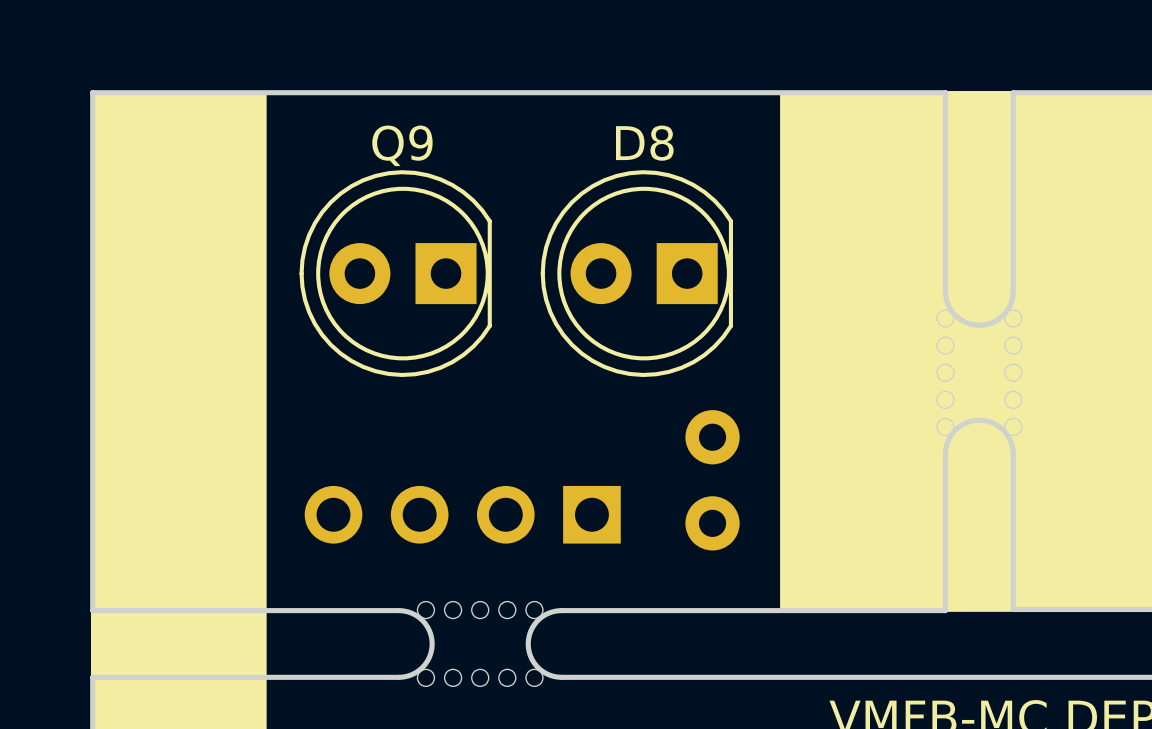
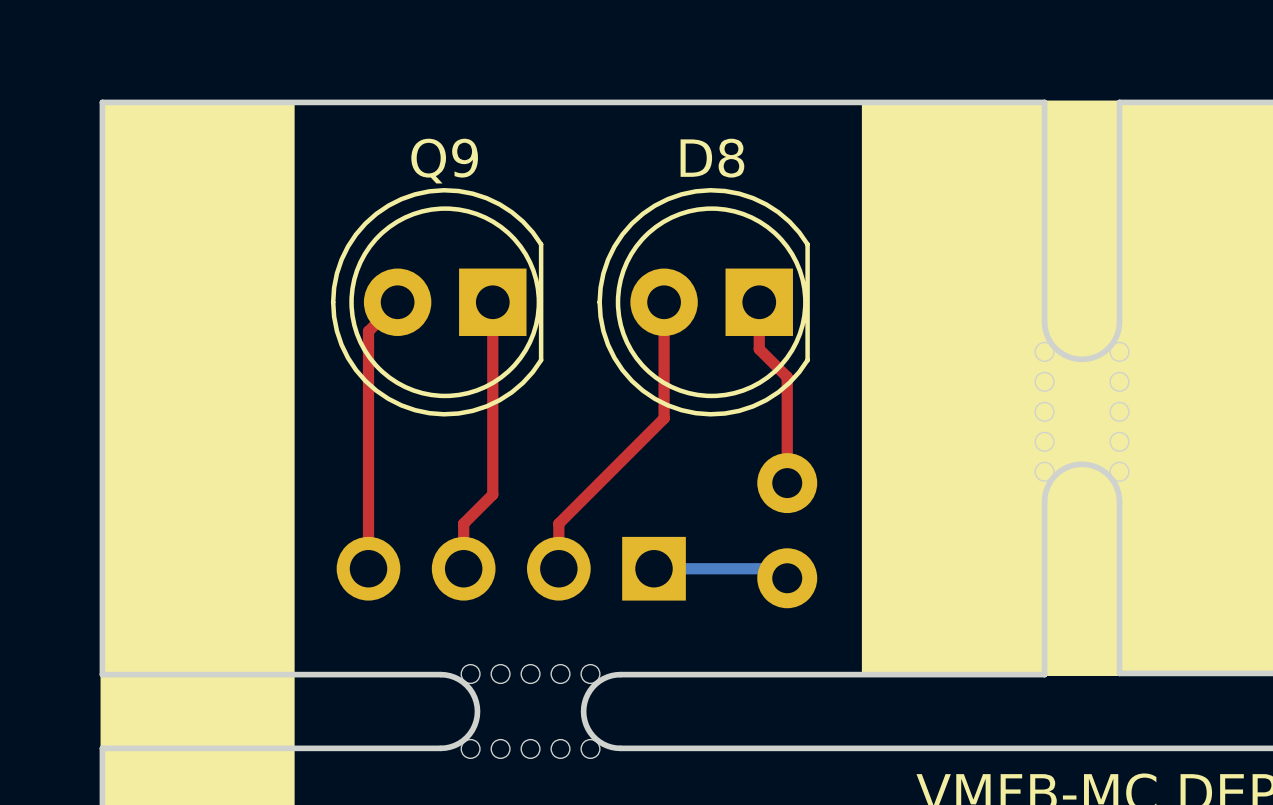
top track: none -> (397, 302) (368, 331) (368, 568)
top track: none -> (492, 302) (492, 494) (463, 523) (463, 568)
top track: none -> (664, 302) (664, 418) (558, 523) (558, 568)
top track: none -> (759, 302) (759, 349) (787, 377) (787, 483)
bottom track: none -> (654, 568) (777, 568) (787, 578)

